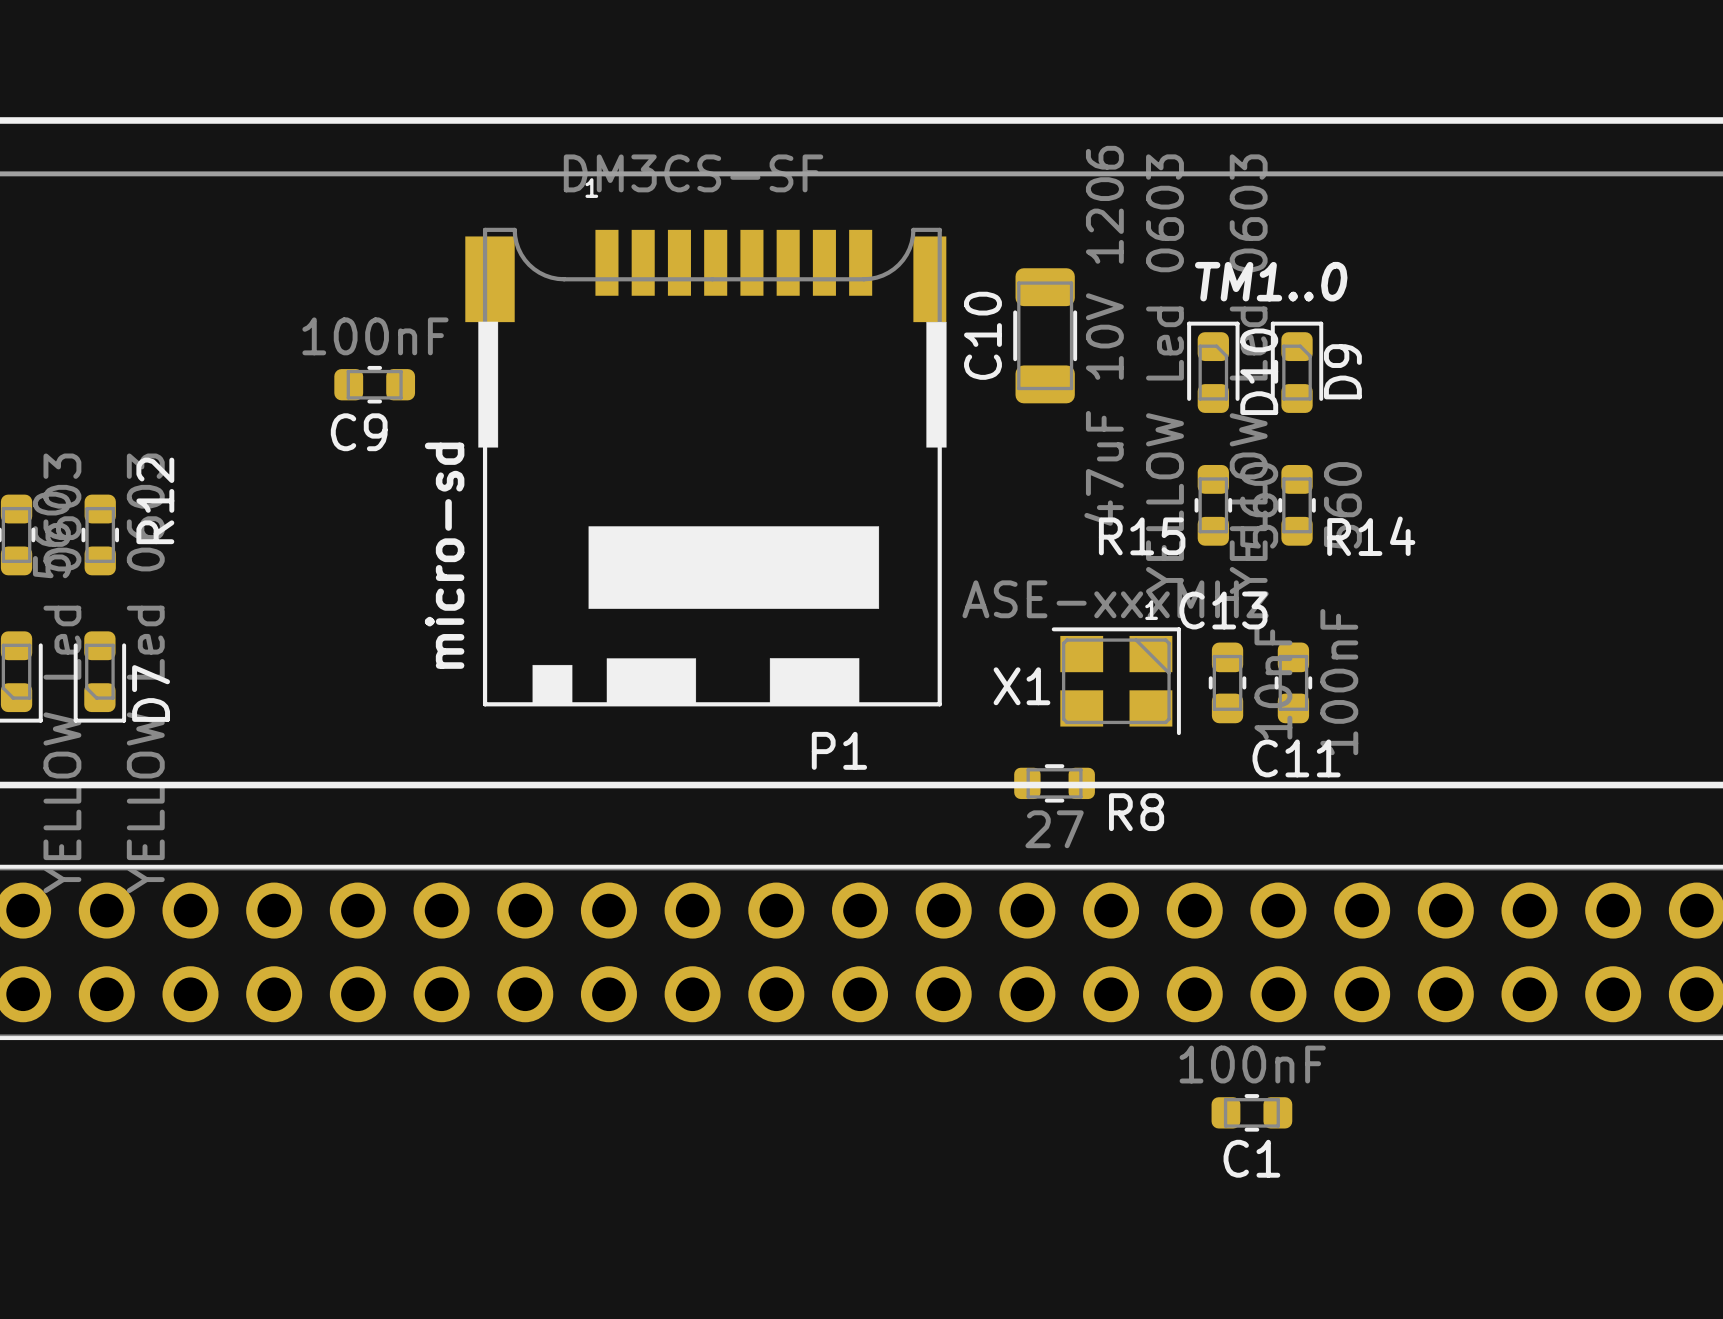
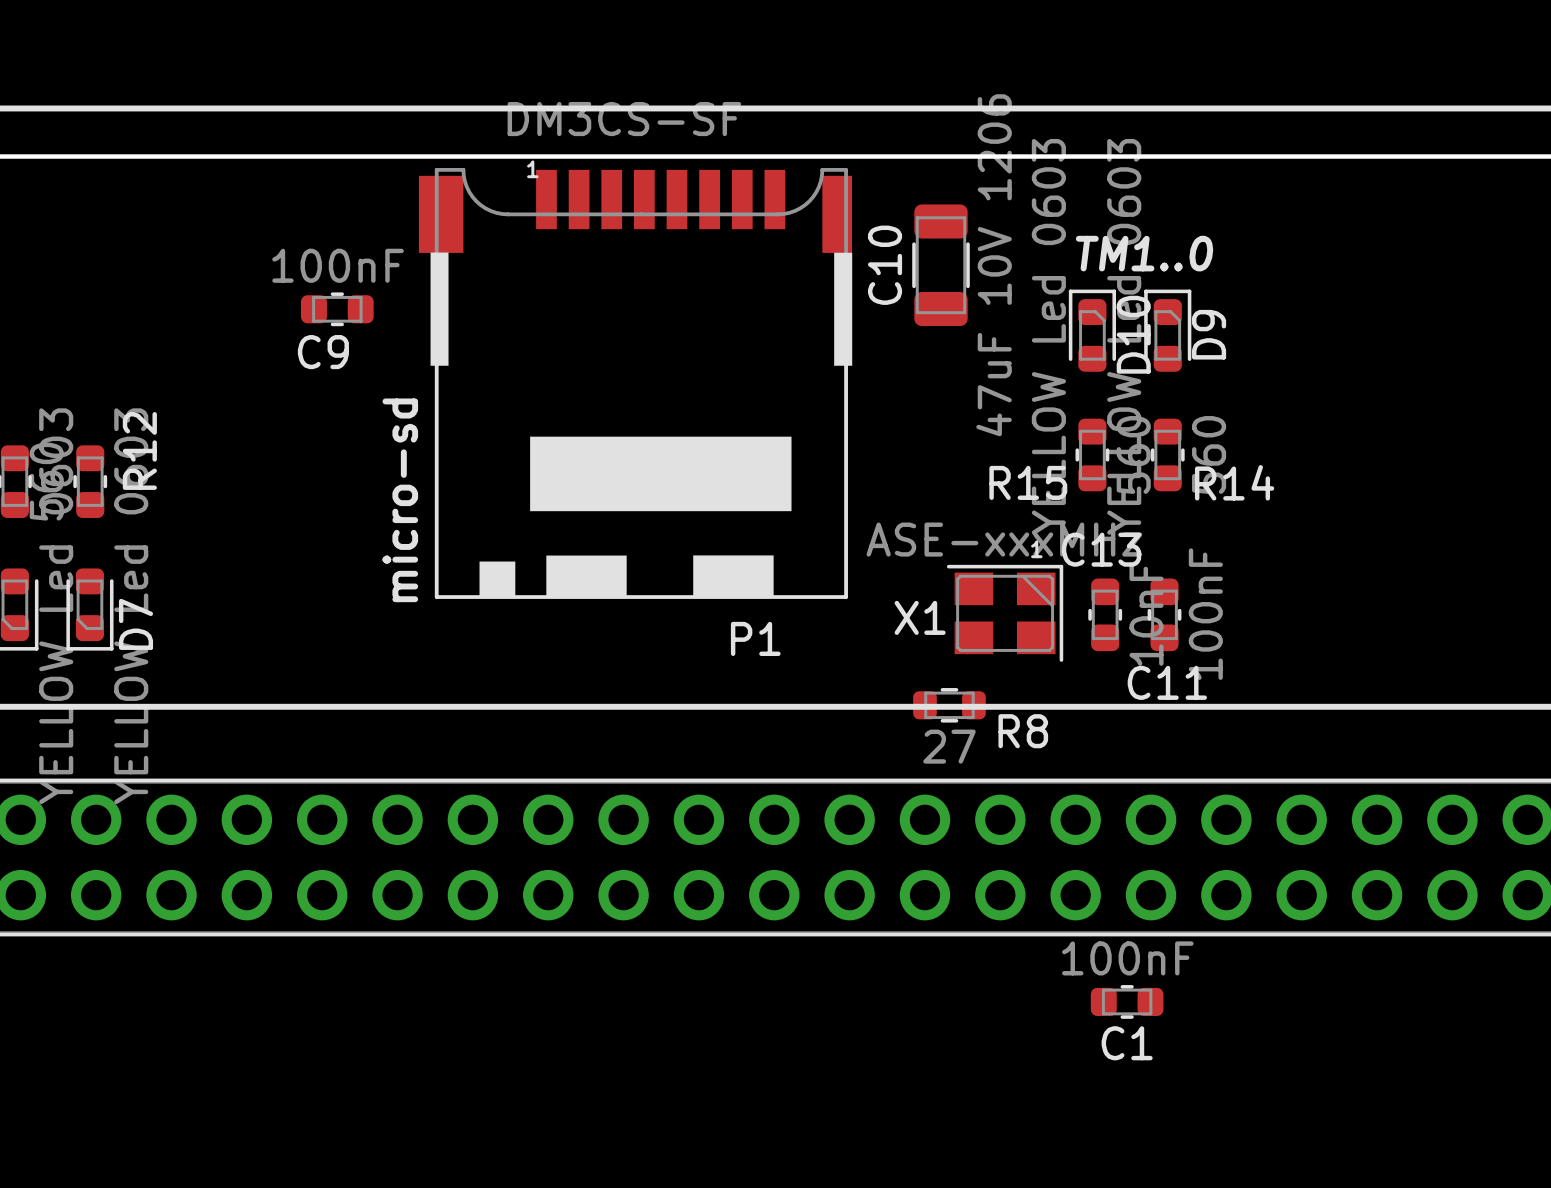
C10 position: (1045, 335) -> (941, 265)
C9 position: (374, 384) -> (337, 309)
P1 position: (705, 467) -> (635, 383)

